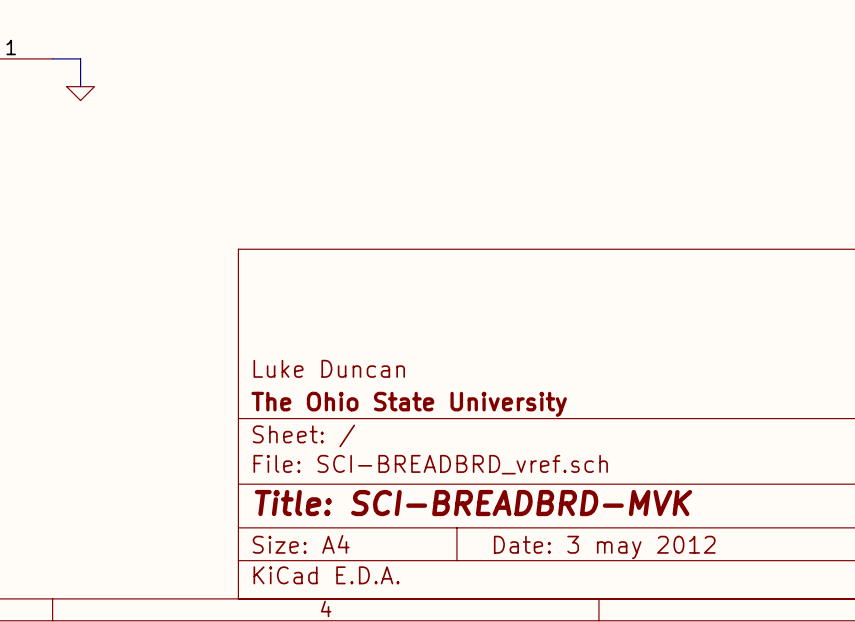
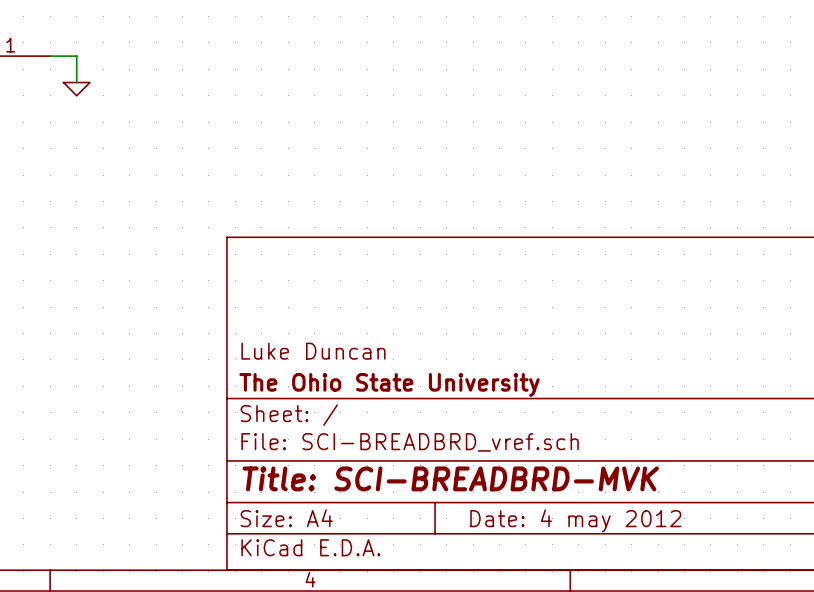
title block: Date: 3 may 2012 (604, 547) -> Date: 4 may 2012 (575, 520)

